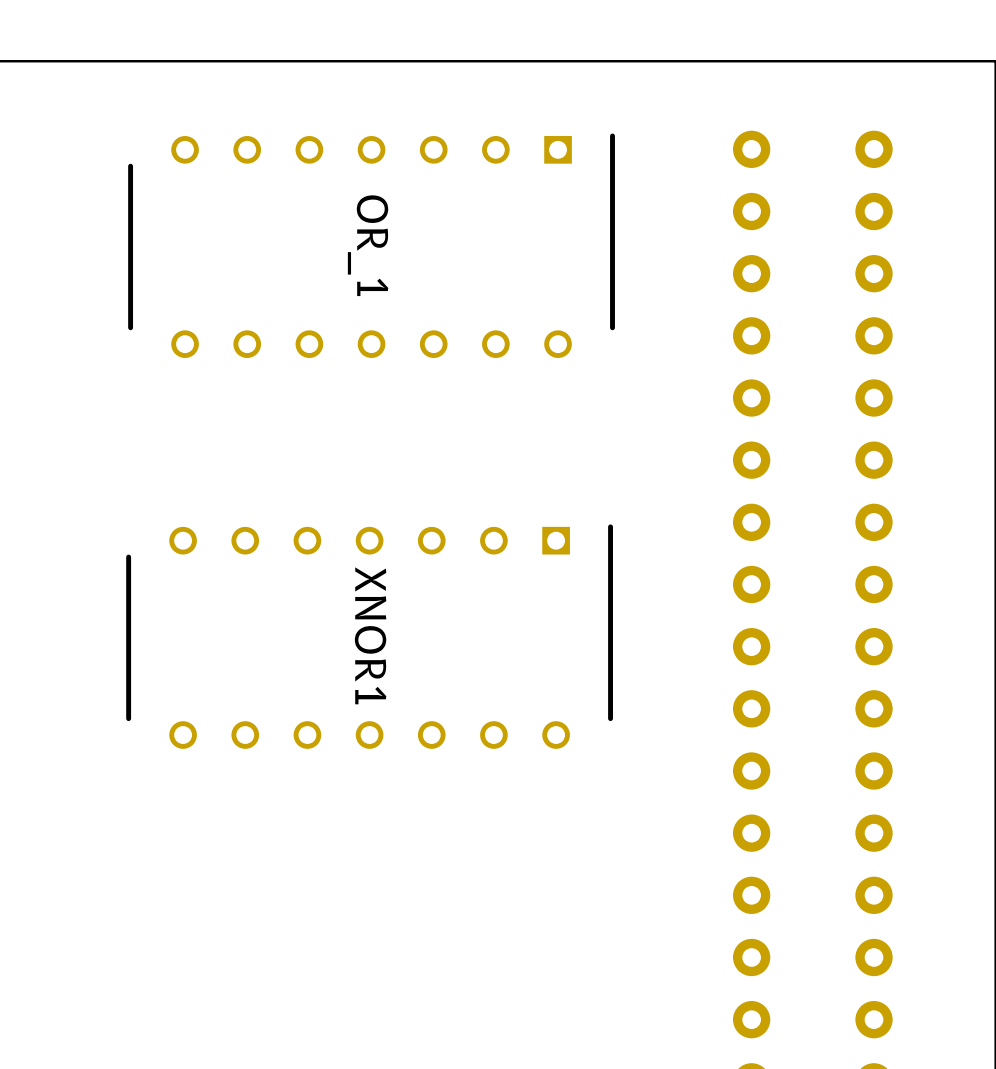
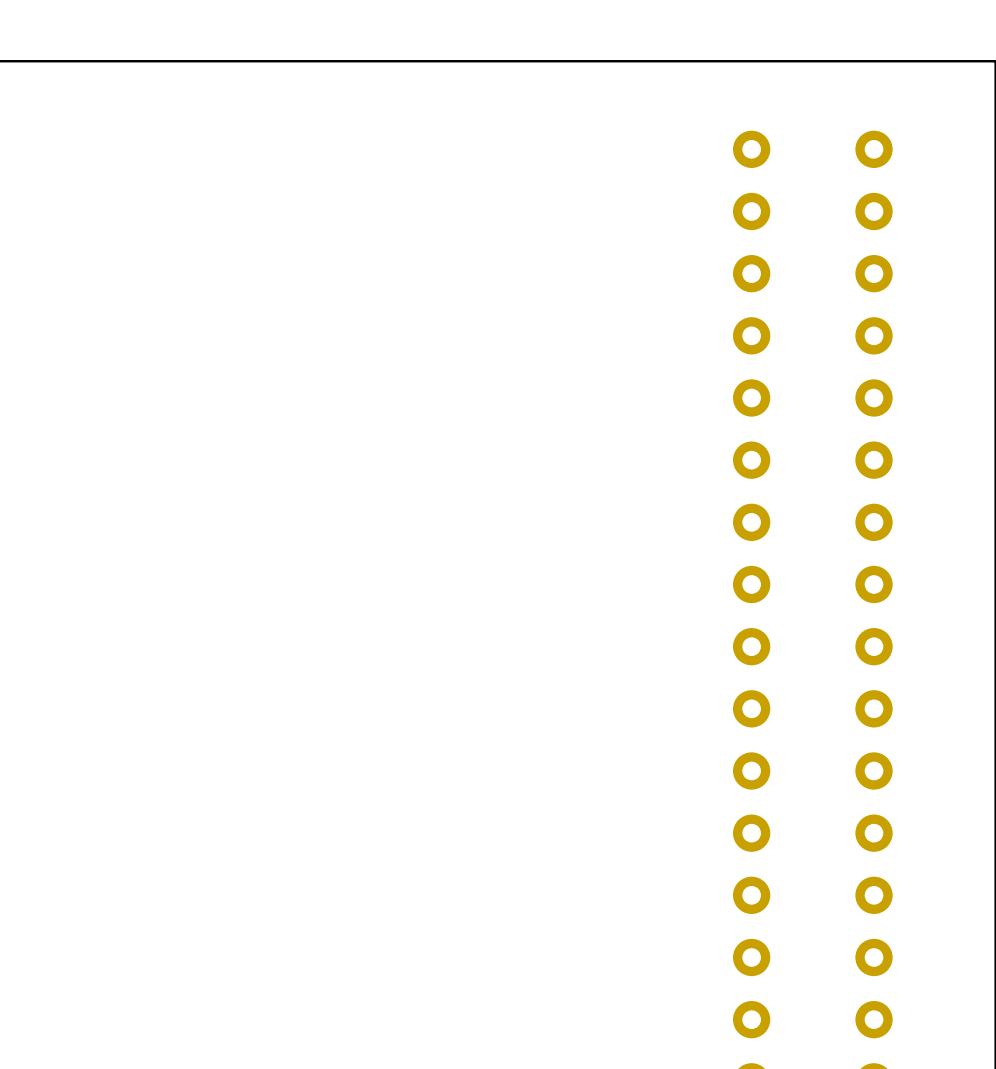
OR_1: (371, 245) -> none
XNOR1: (369, 636) -> none

